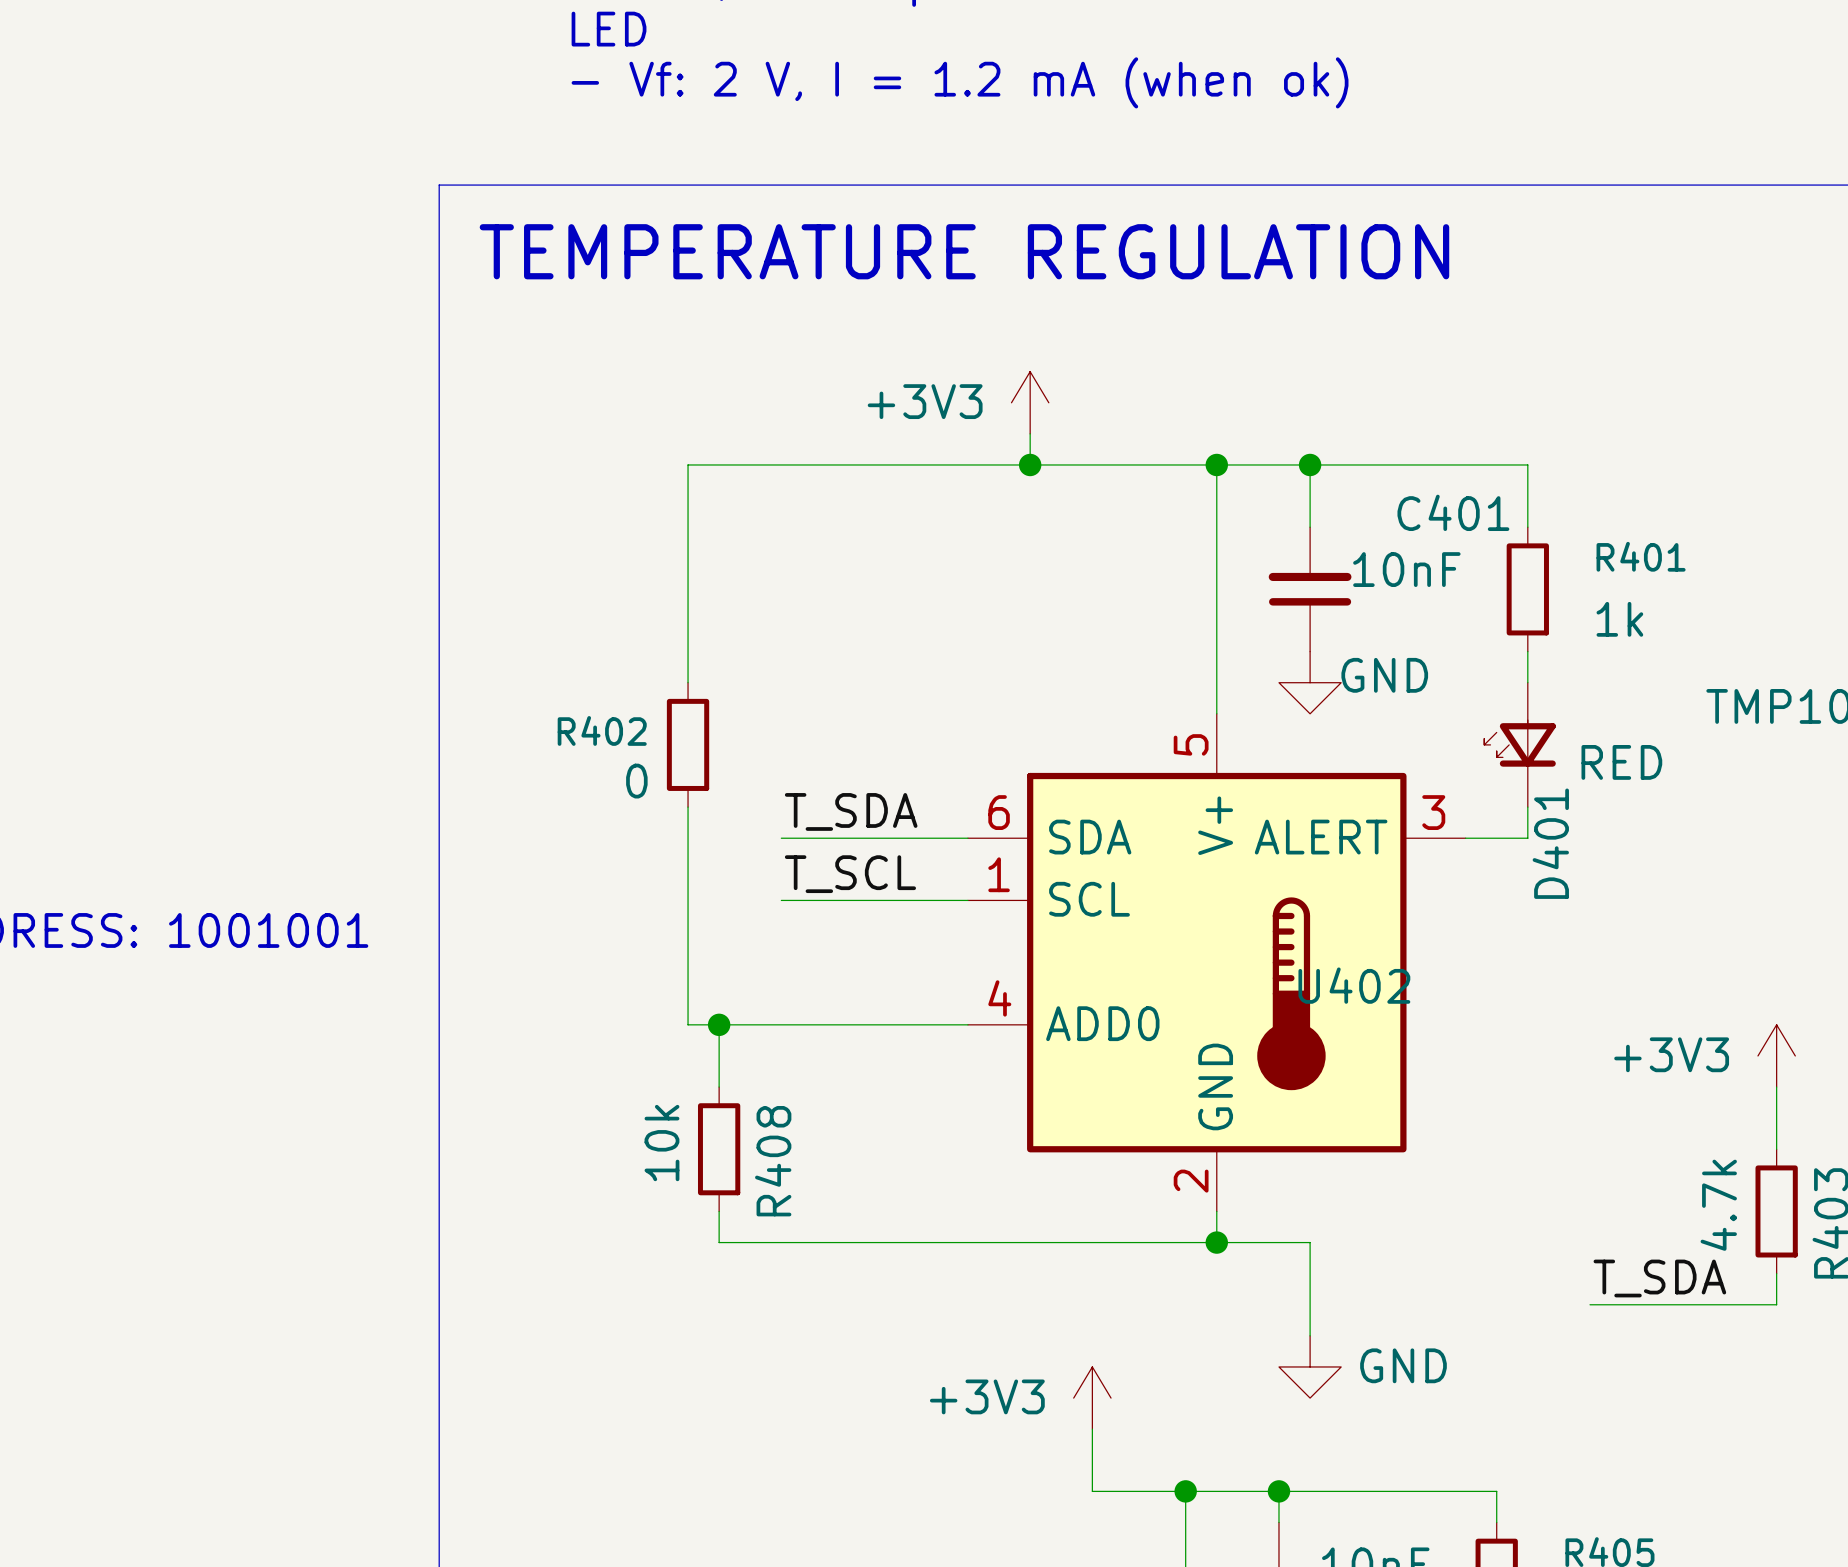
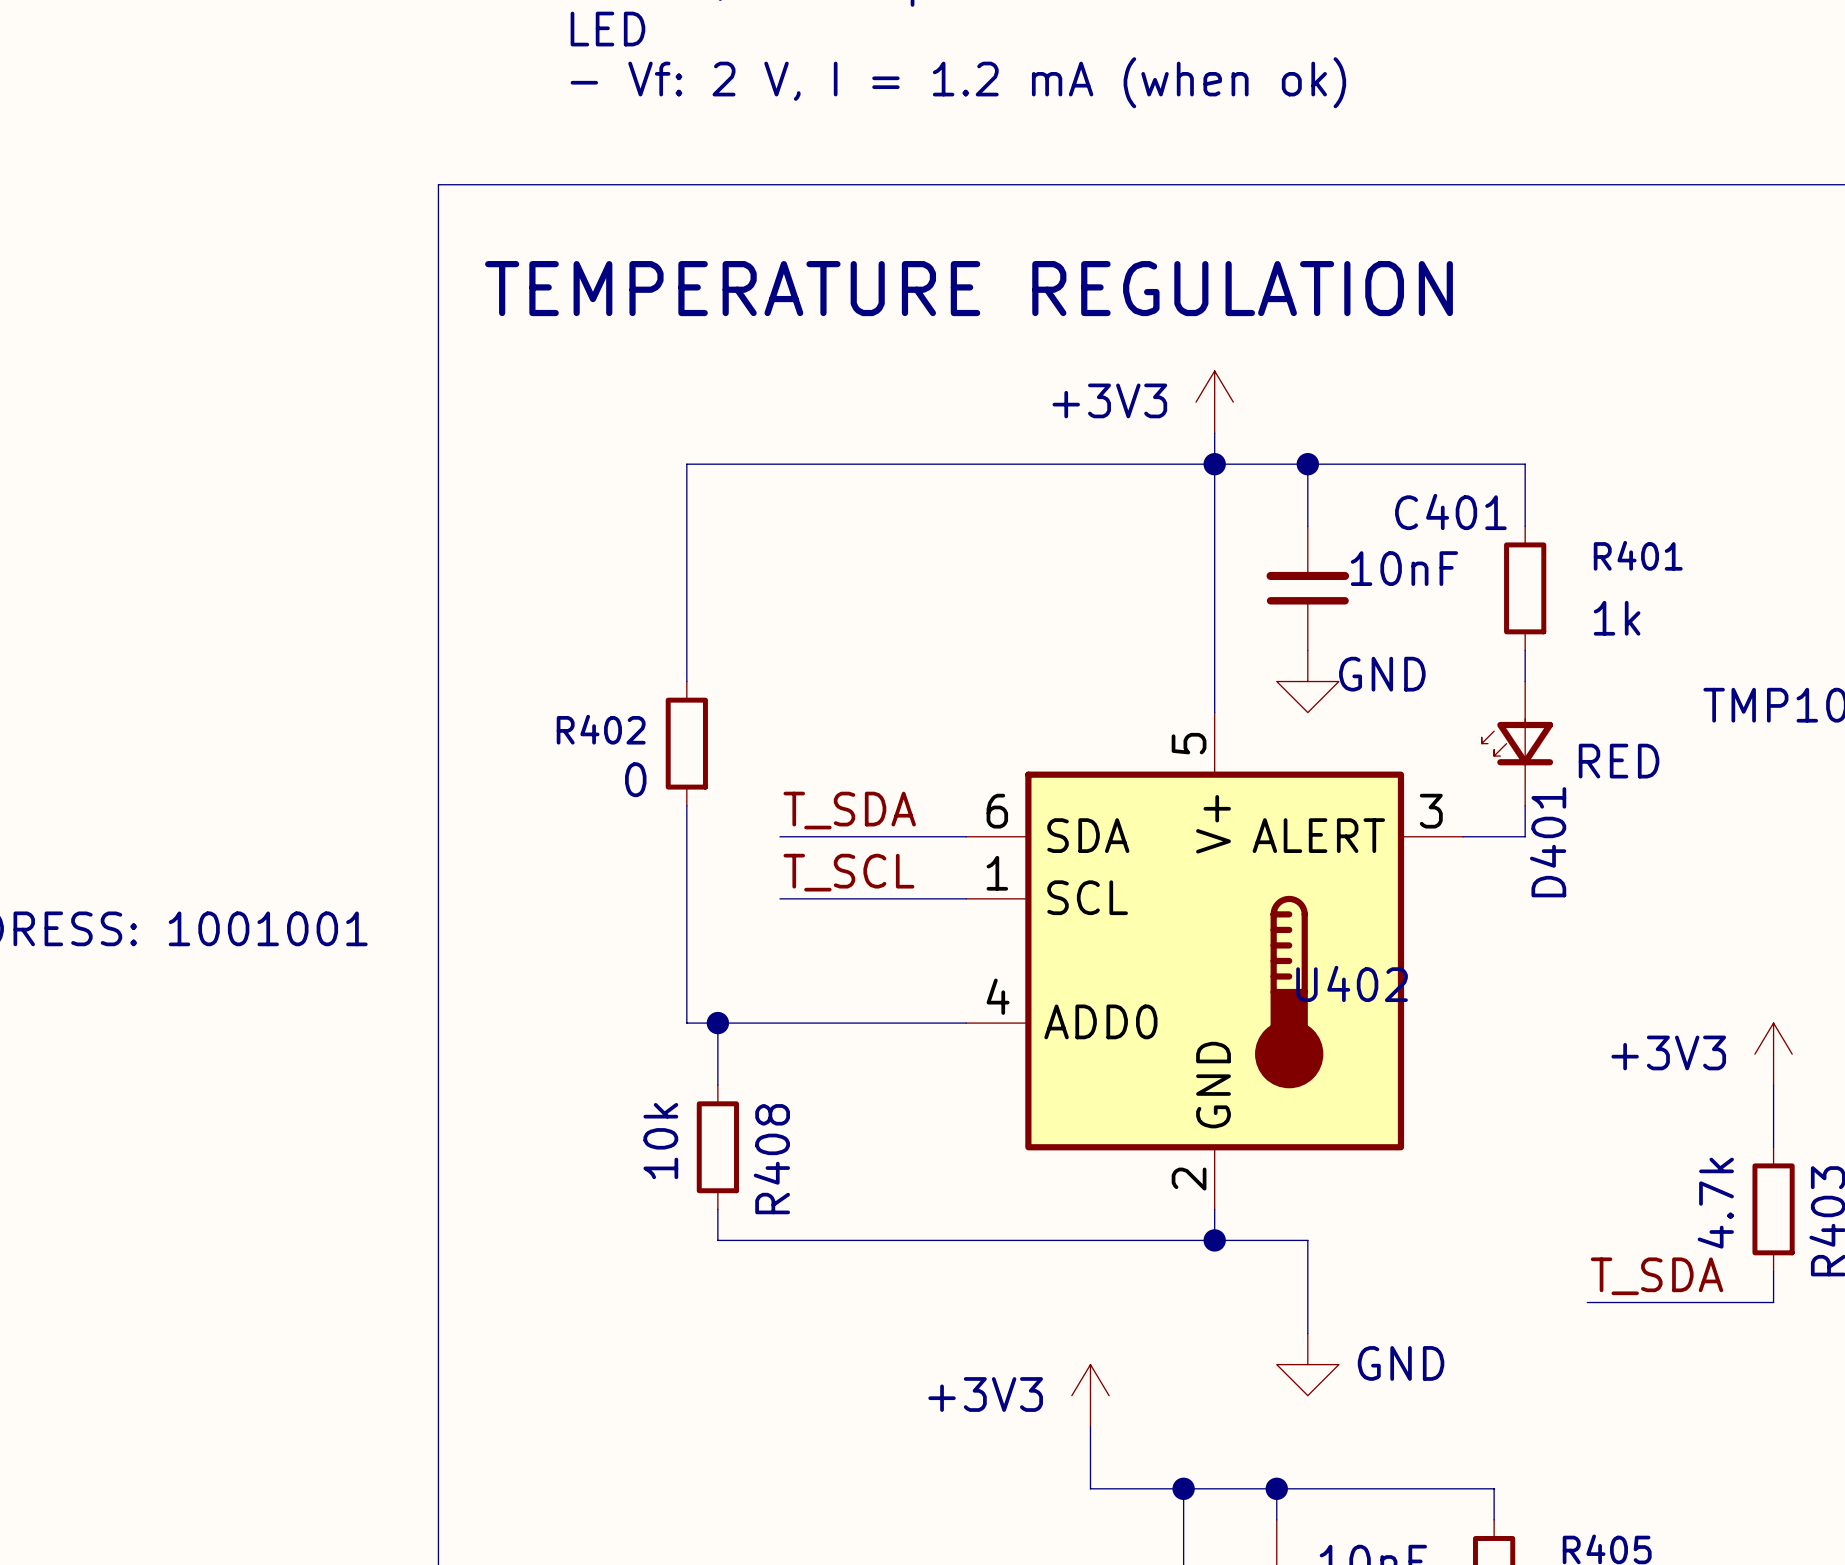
text position: TEMPERATURE REGULATION (964, 251) -> TEMPERATURE REGULATION (969, 288)
power symbol position: +3V3 (1030, 402) -> +3V3 (1214, 402)
wire: (1030, 433) (1030, 464) -> (1214, 433) (1214, 464)
junction: (1030, 464) -> none

